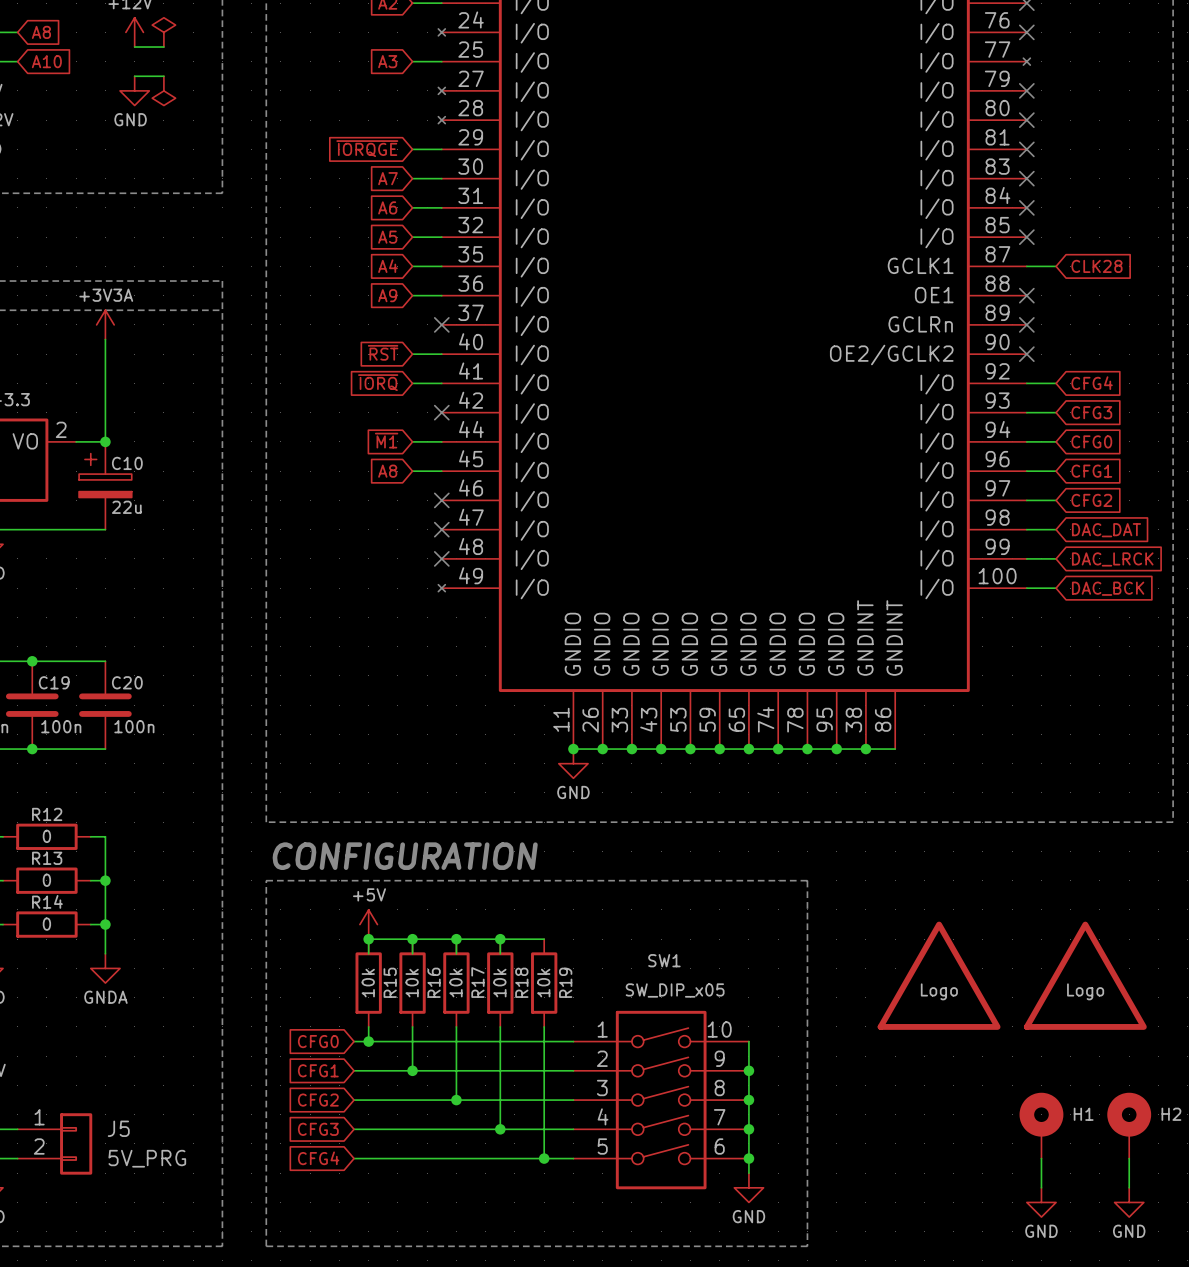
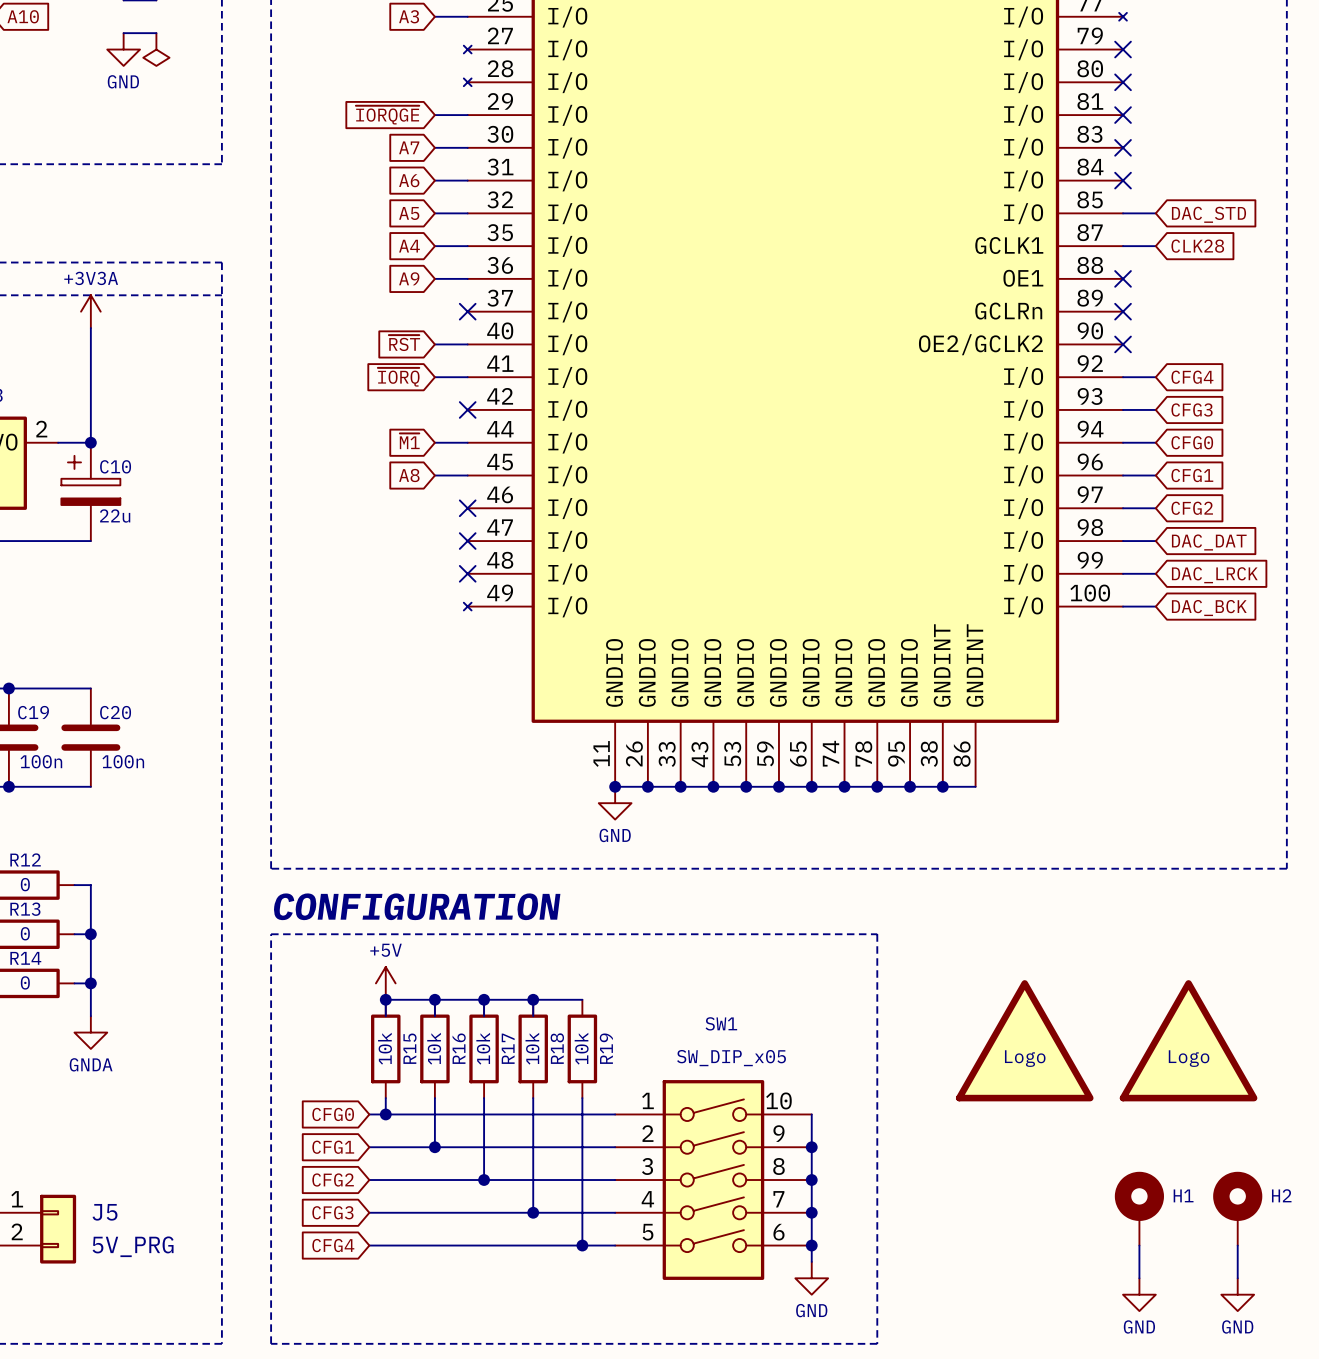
wire: none -> (1123, 213) (1155, 213)
no-connect mark: (1026, 237) -> none
global label: none -> DAC_STD (1208, 214)

